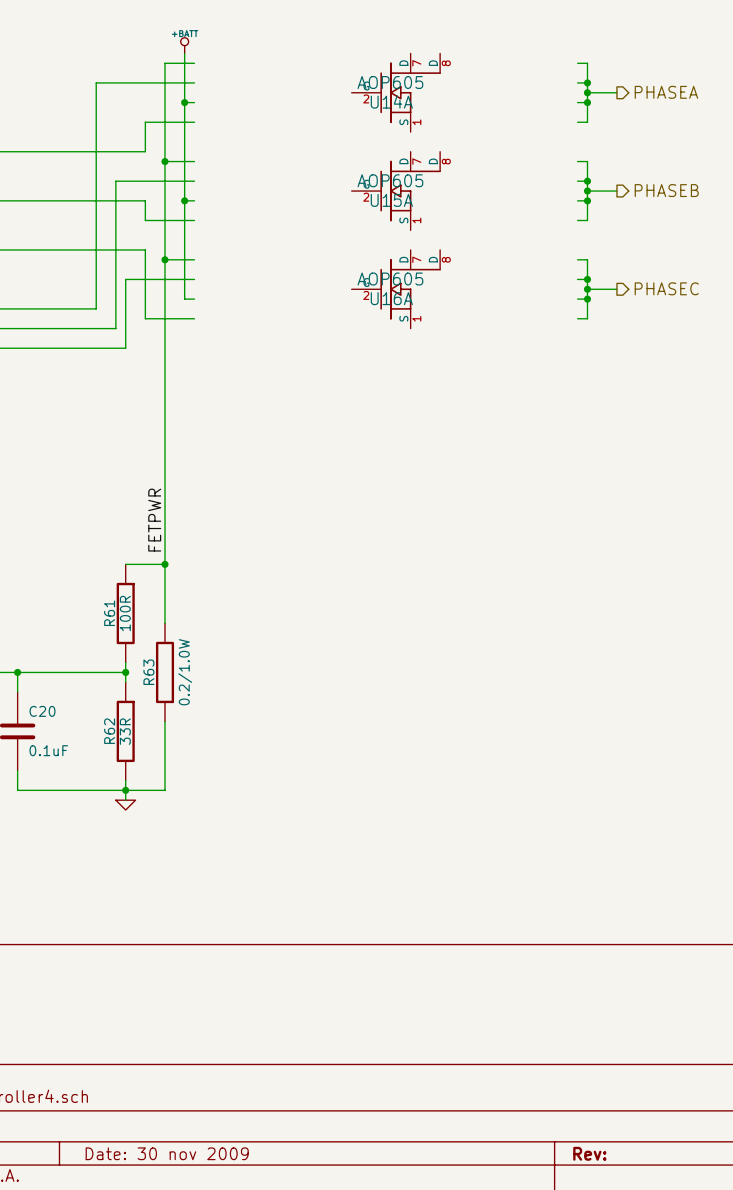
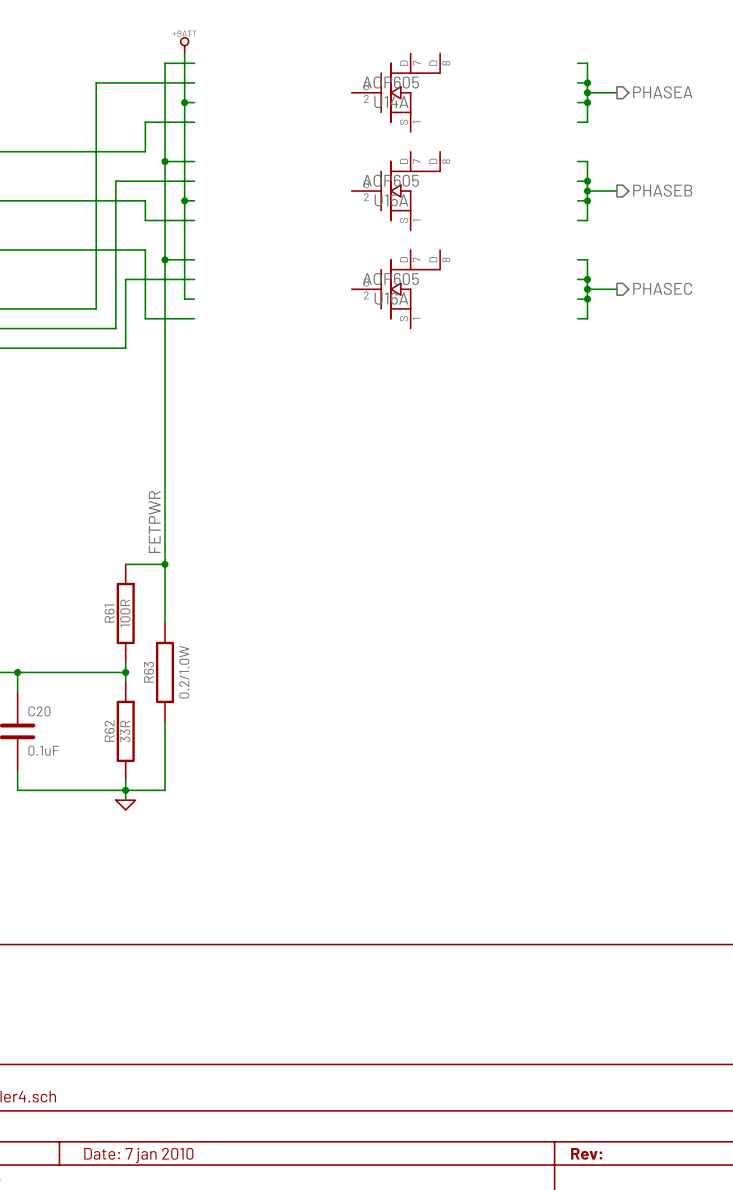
title block: Date: 30 nov 2009 (167, 1153) -> Date: 7 jan 2010 (138, 1155)

